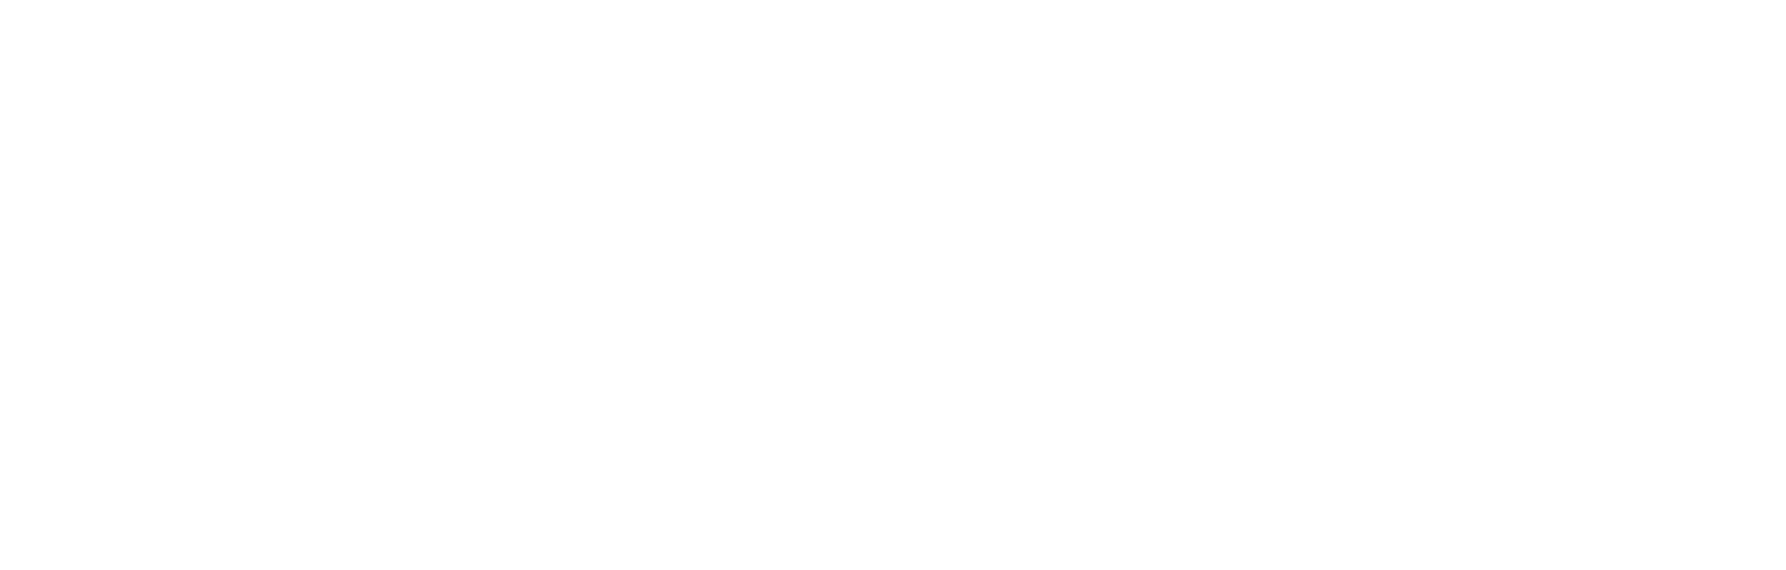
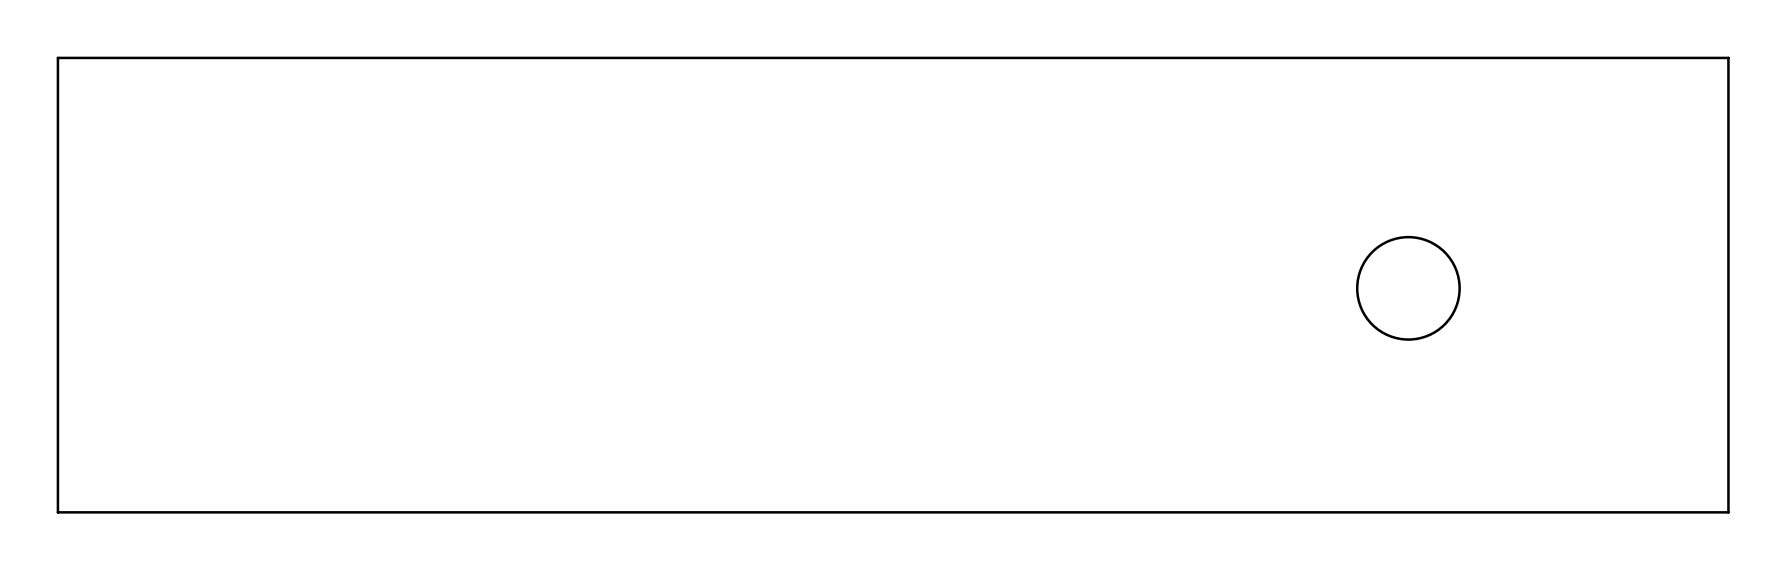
board edge: none -> (1728, 57) (1728, 512) (57, 512) (57, 57) (1728, 57)
round board edge: none -> [1355, 235, 1461, 341]

